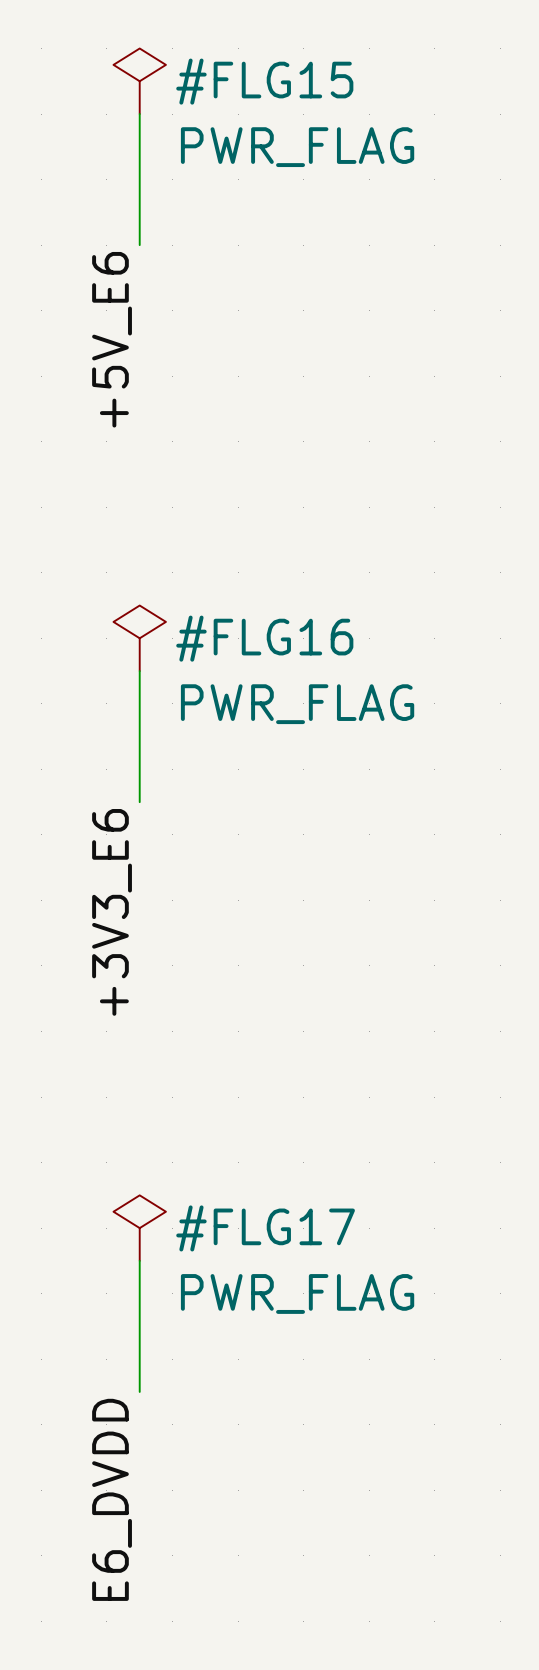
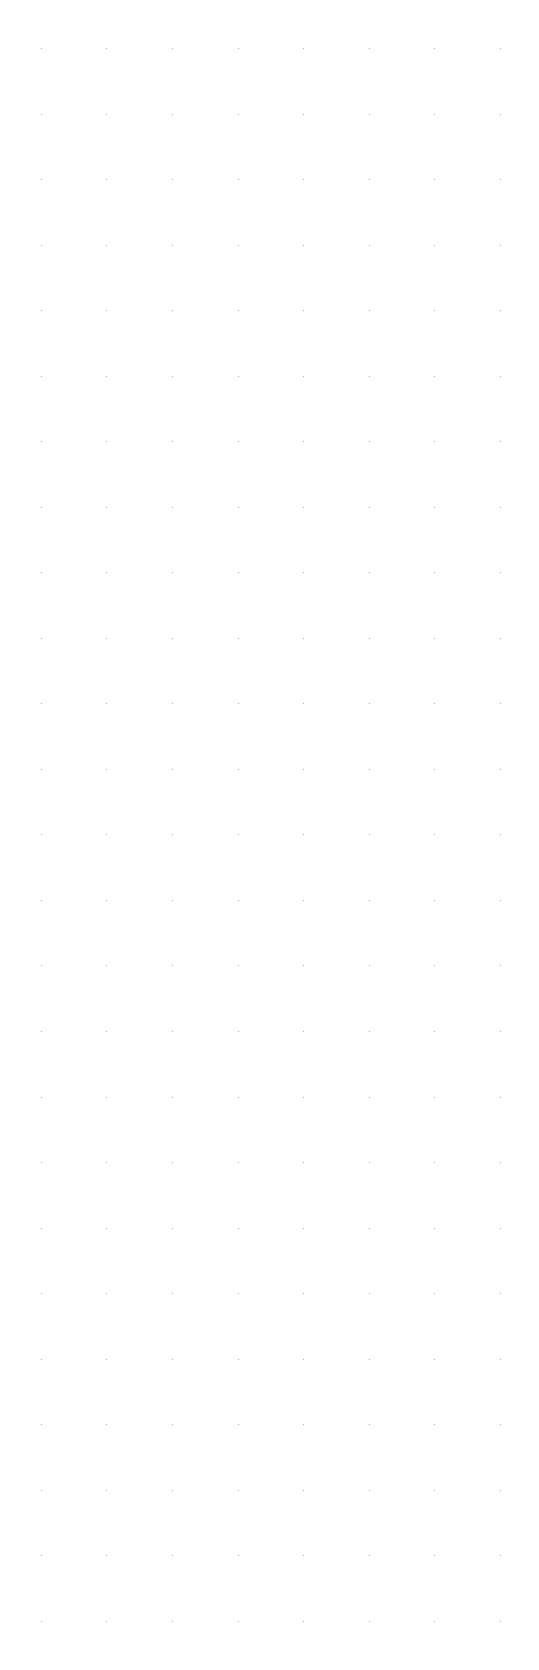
#FLG15: PWR_FLAG (139, 81) -> none
wire: (139, 114) (139, 245) -> none
label: +5V_E6 (112, 339) -> none
#FLG16: PWR_FLAG (139, 638) -> none
wire: (139, 671) (139, 802) -> none
label: +3V3_E6 (112, 912) -> none
#FLG17: PWR_FLAG (139, 1228) -> none
wire: (139, 1260) (139, 1391) -> none
label: E6_DVDD (112, 1499) -> none

